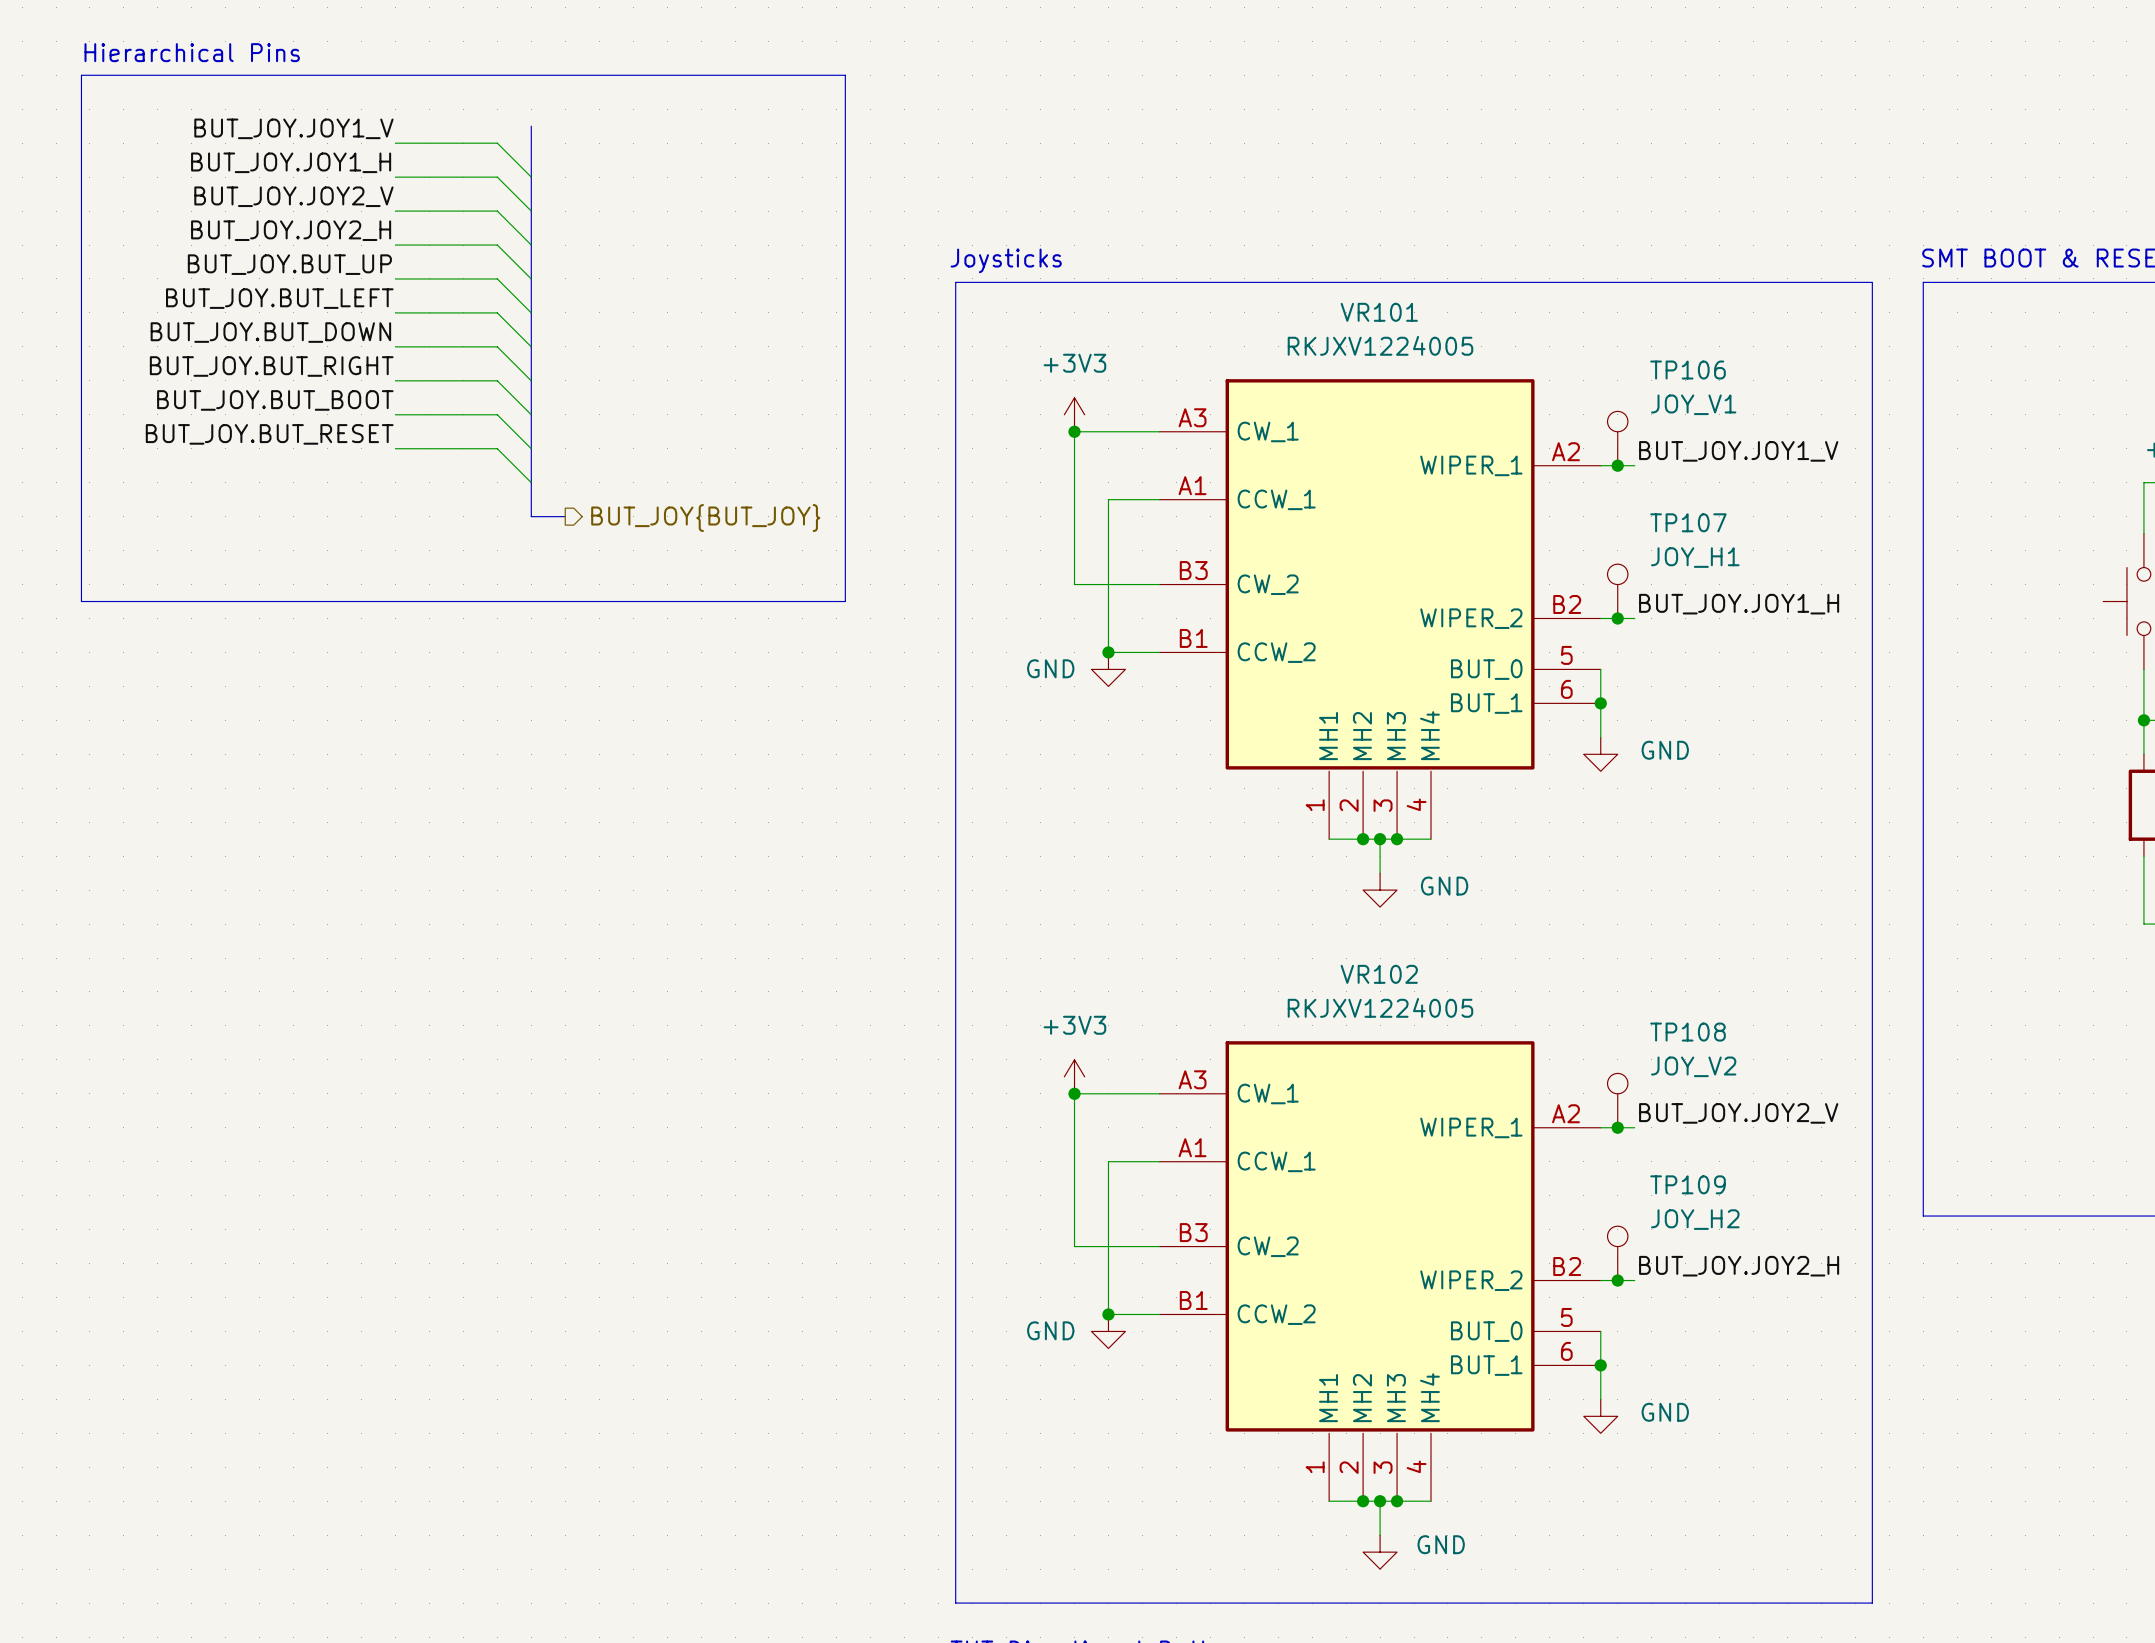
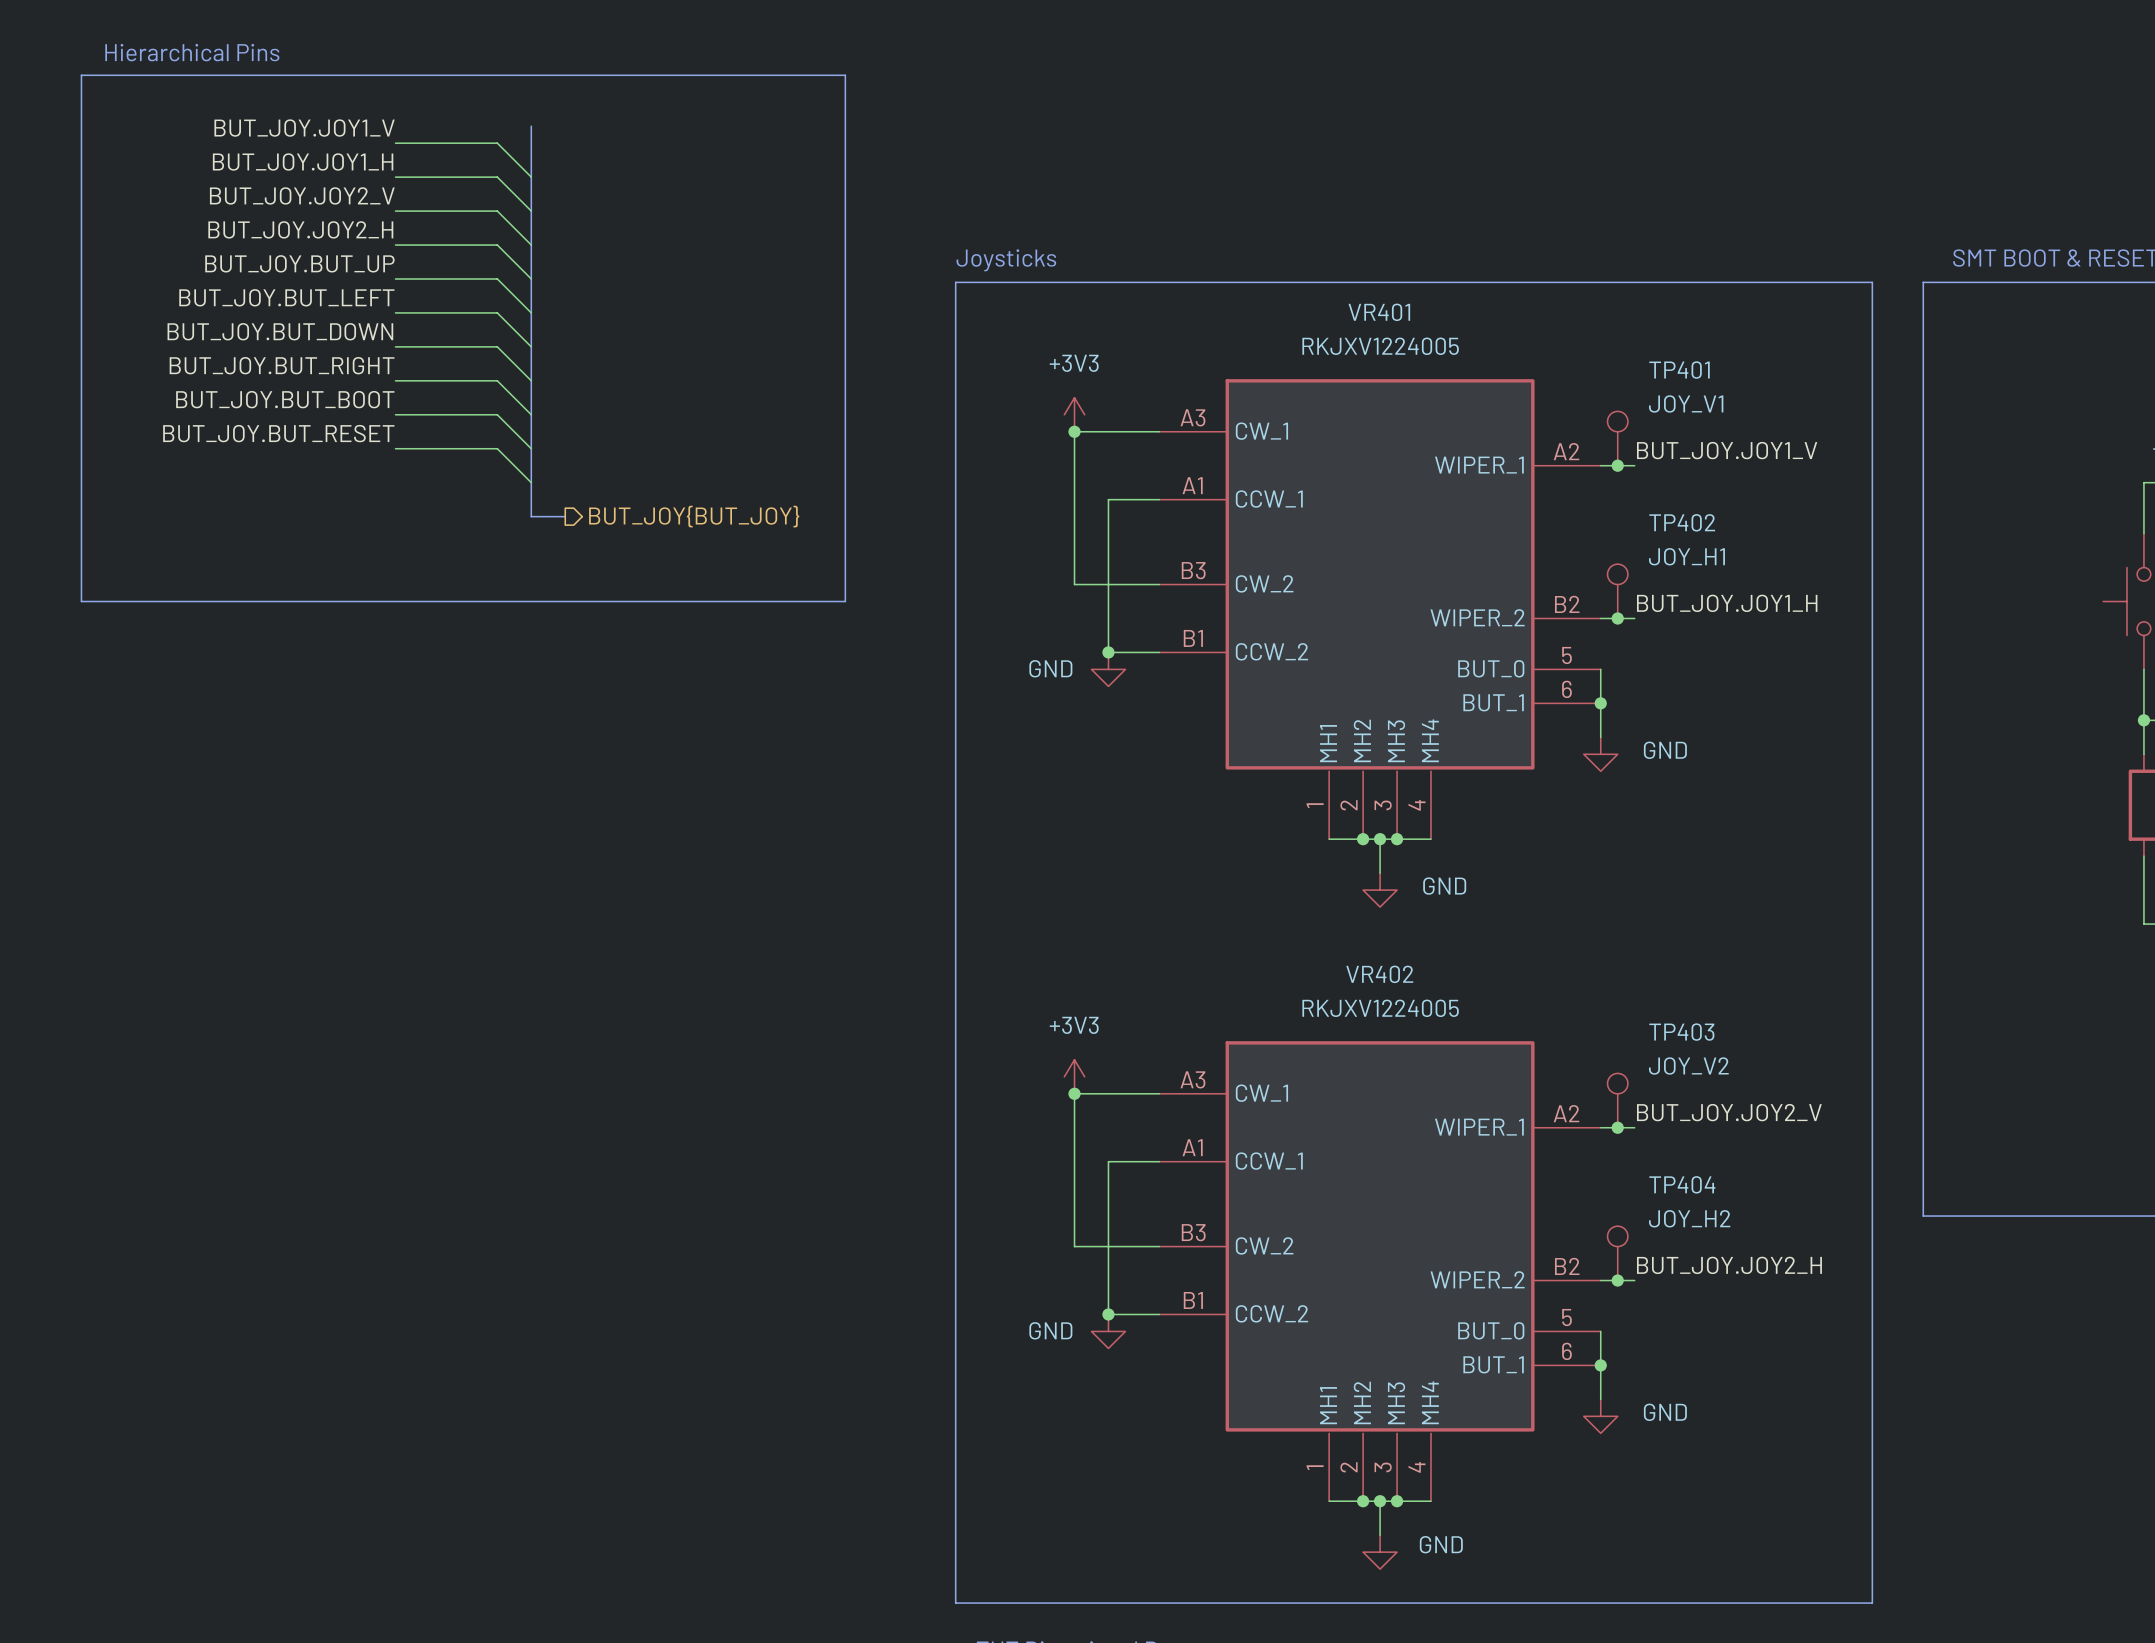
VR101 name: VR101 (1379, 312) -> VR401 (1379, 312)
TP106 name: TP106 (1688, 370) -> TP401 (1679, 370)
TP107 name: TP107 (1688, 522) -> TP402 (1682, 522)
VR102 name: VR102 (1379, 974) -> VR402 (1379, 974)
TP108 name: TP108 (1688, 1032) -> TP403 (1681, 1032)
TP109 name: TP109 (1688, 1184) -> TP404 (1682, 1184)

